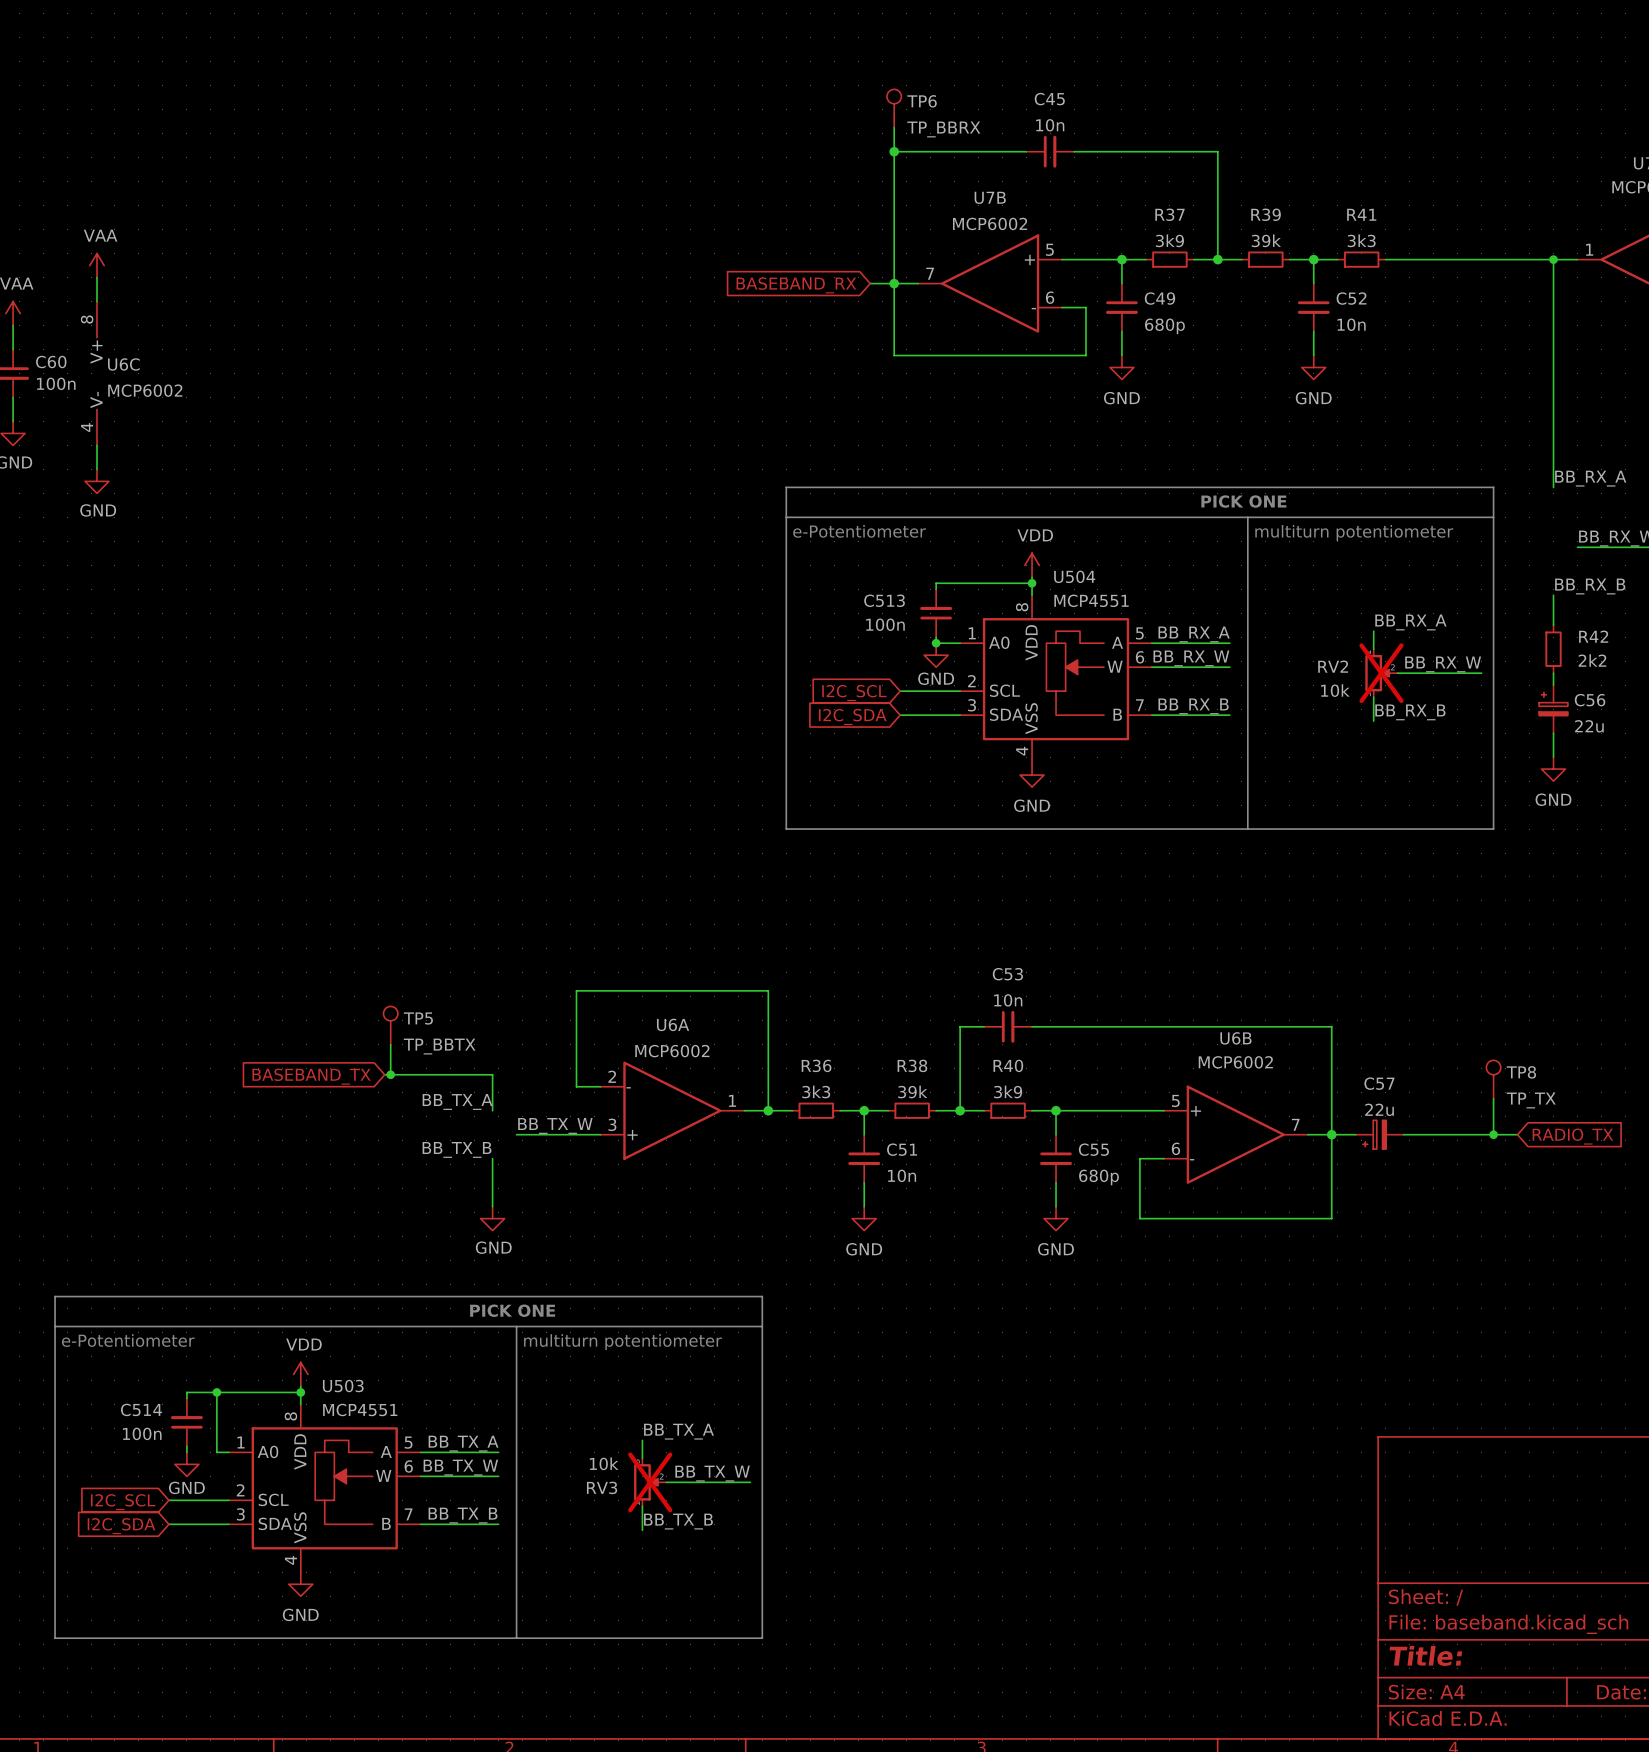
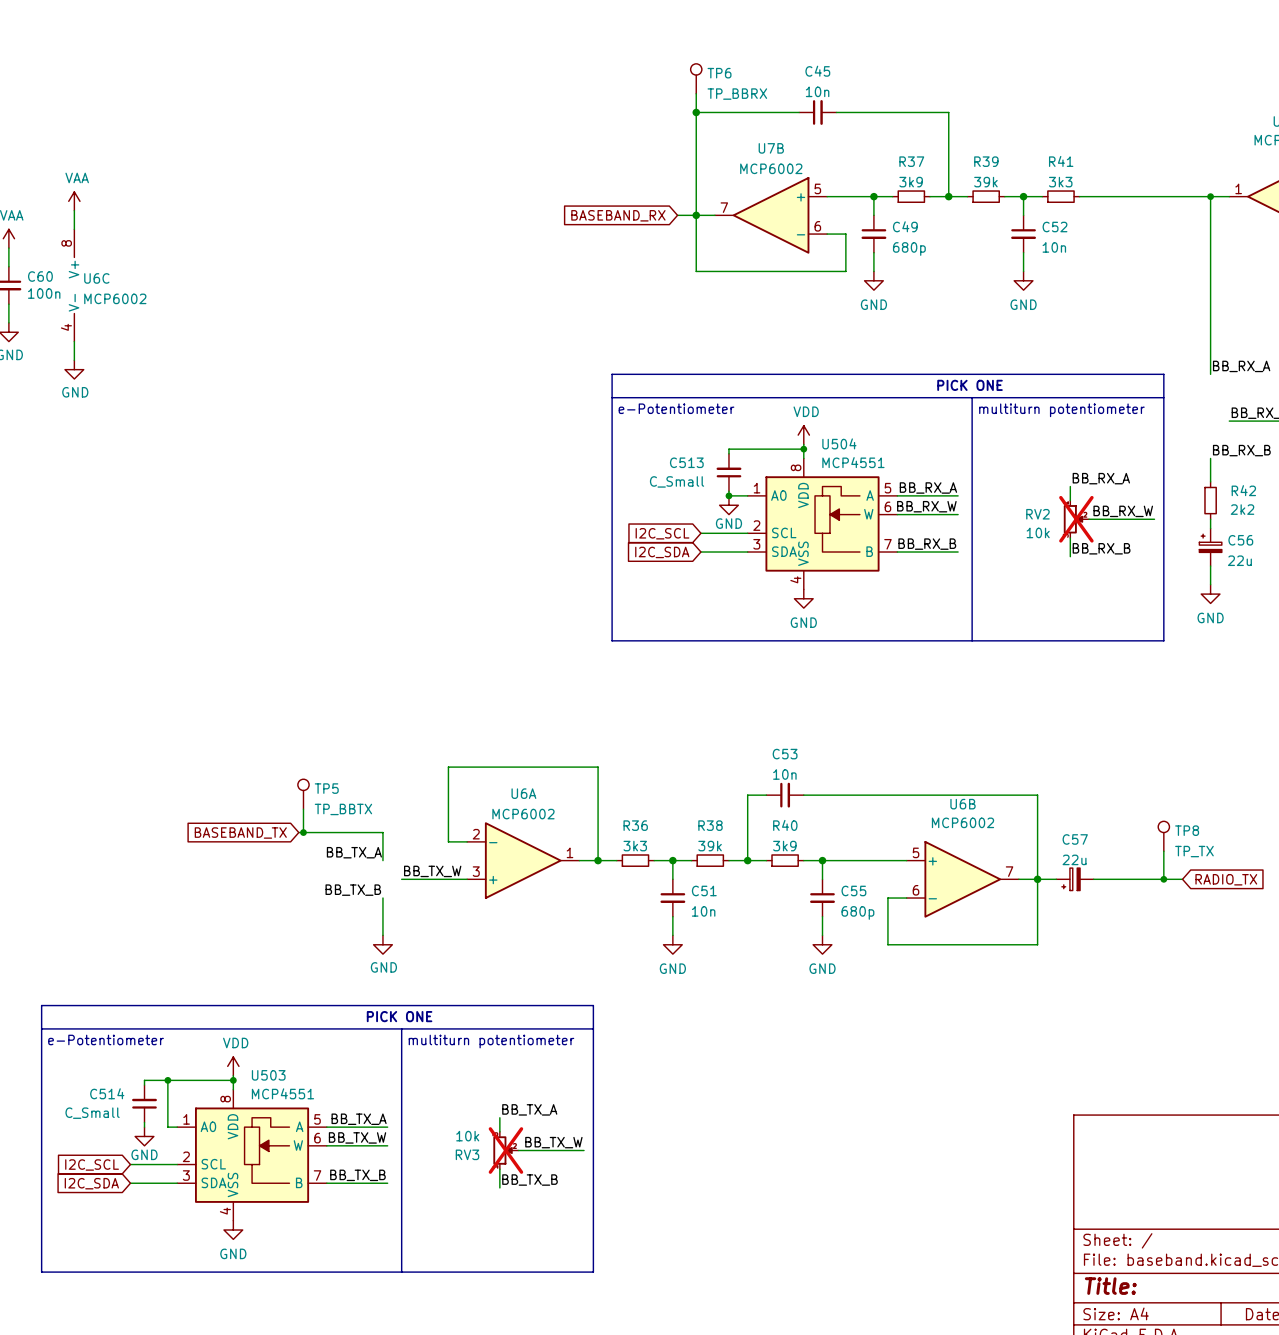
C513 value: 100n (885, 624) -> C_Small (677, 481)
C514 value: 100n (142, 1433) -> C_Small (92, 1113)

